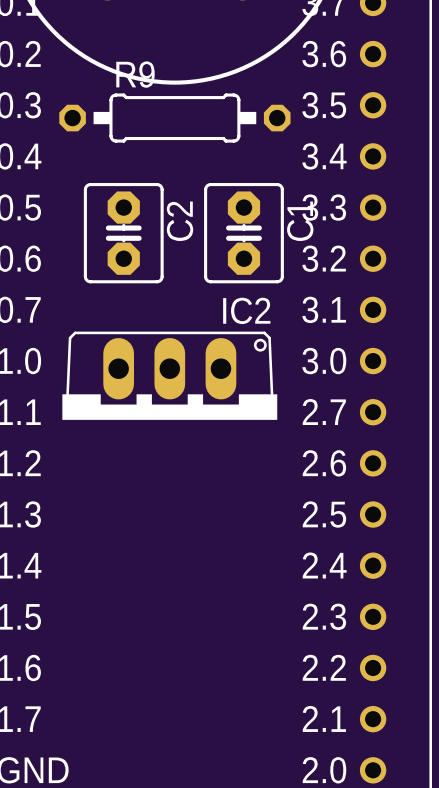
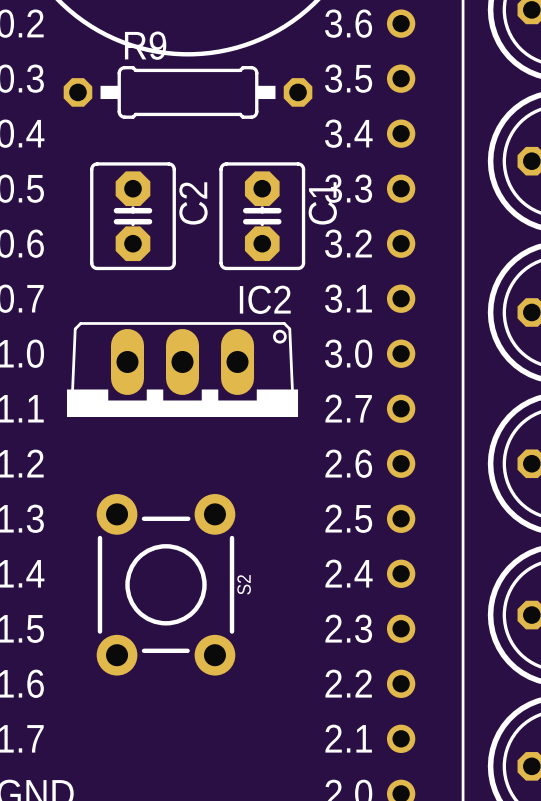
S2: none -> (166, 584)

